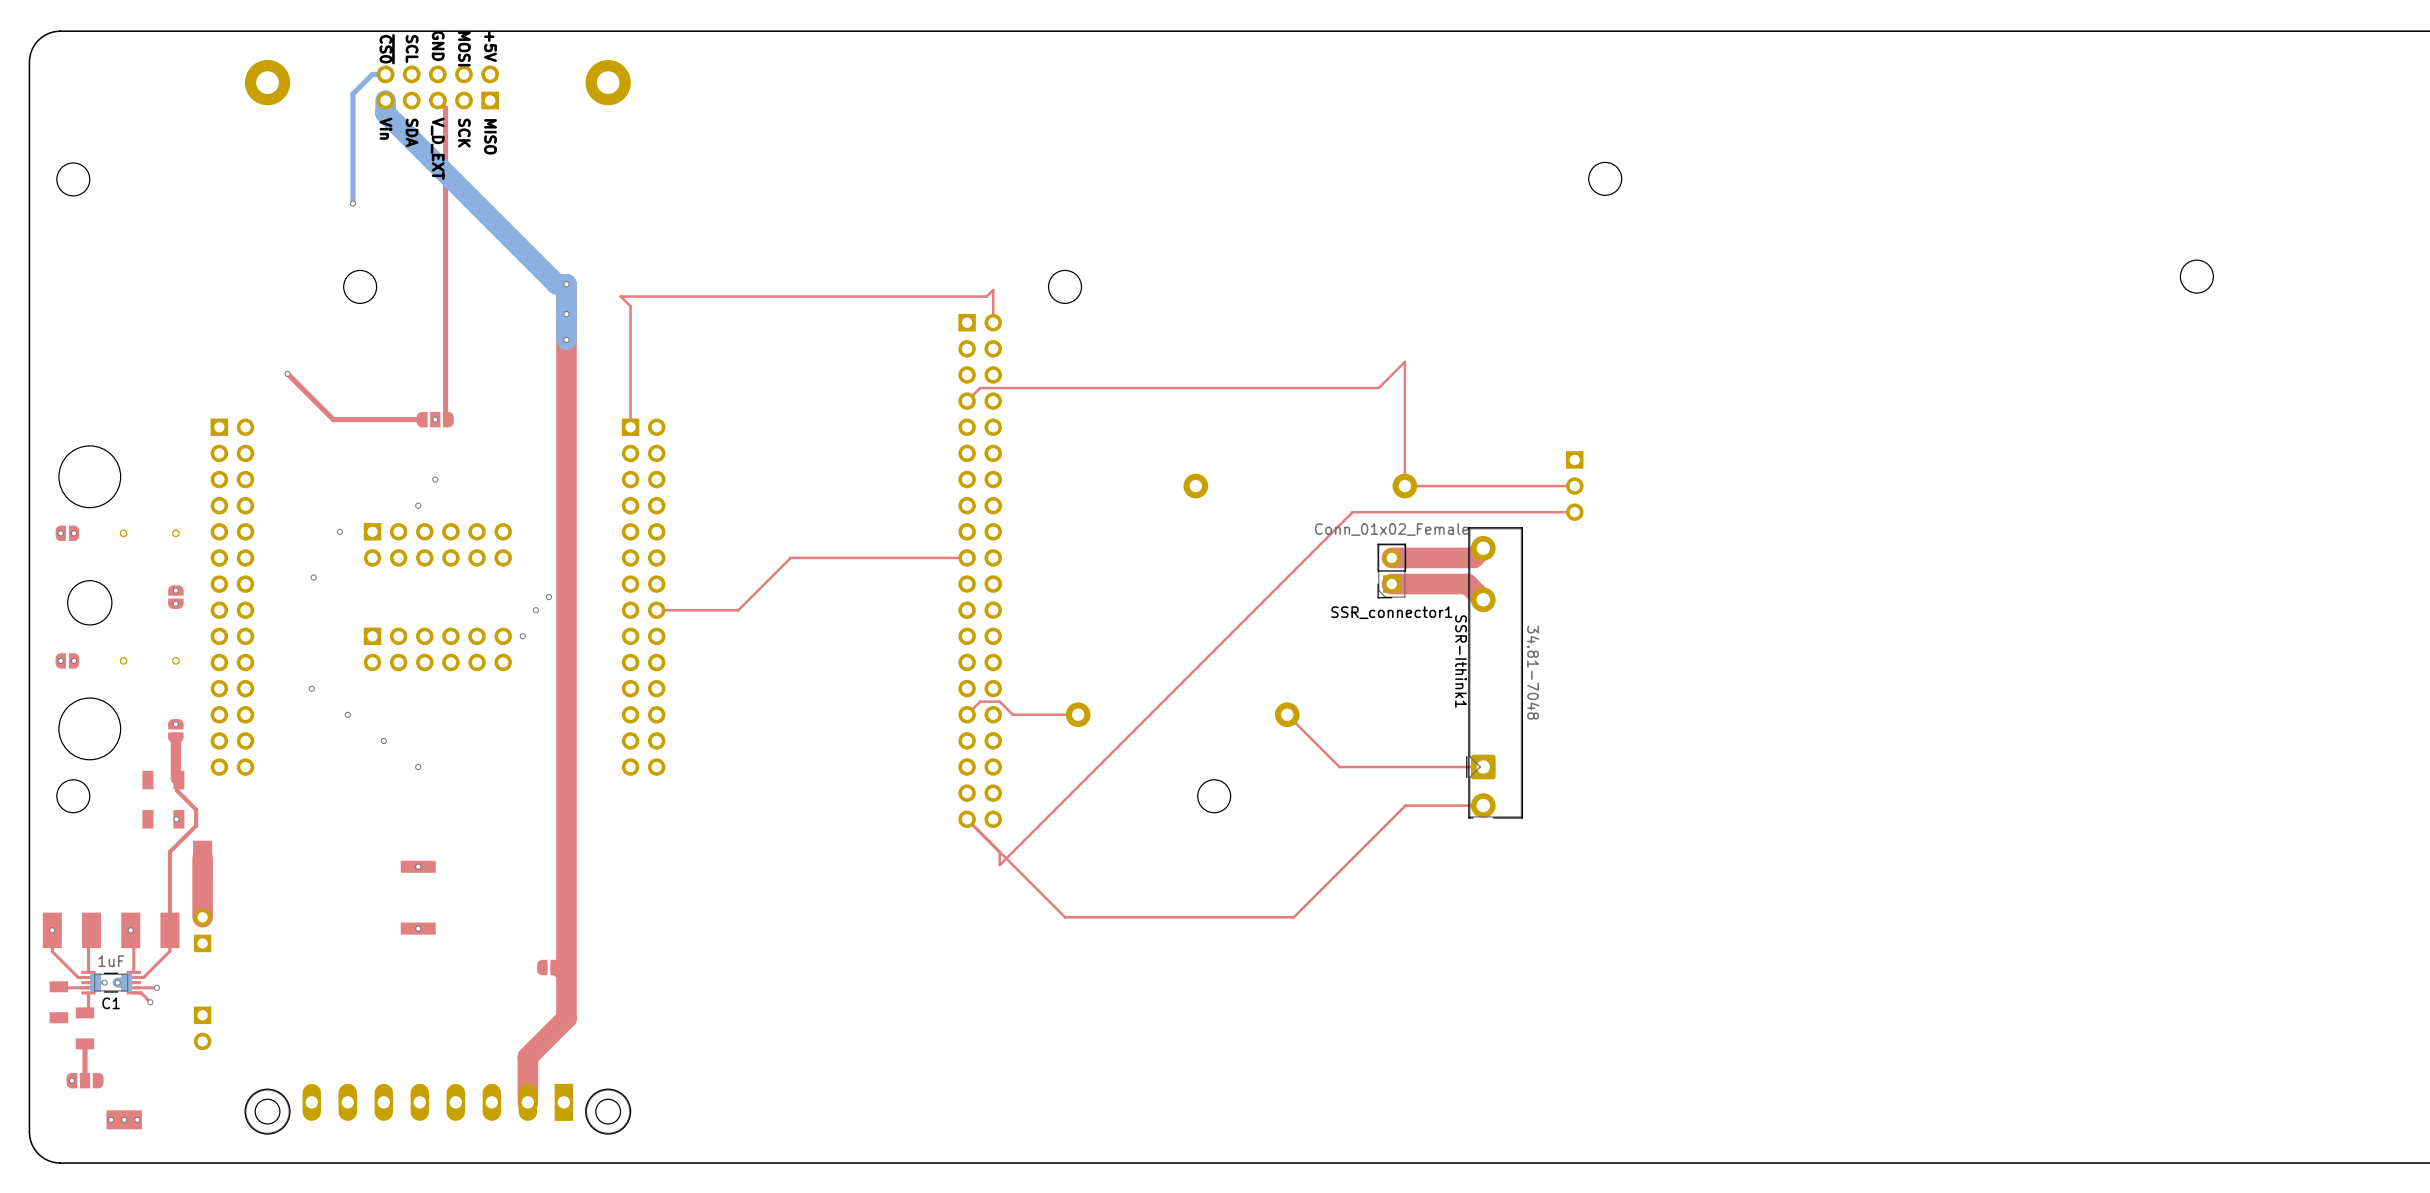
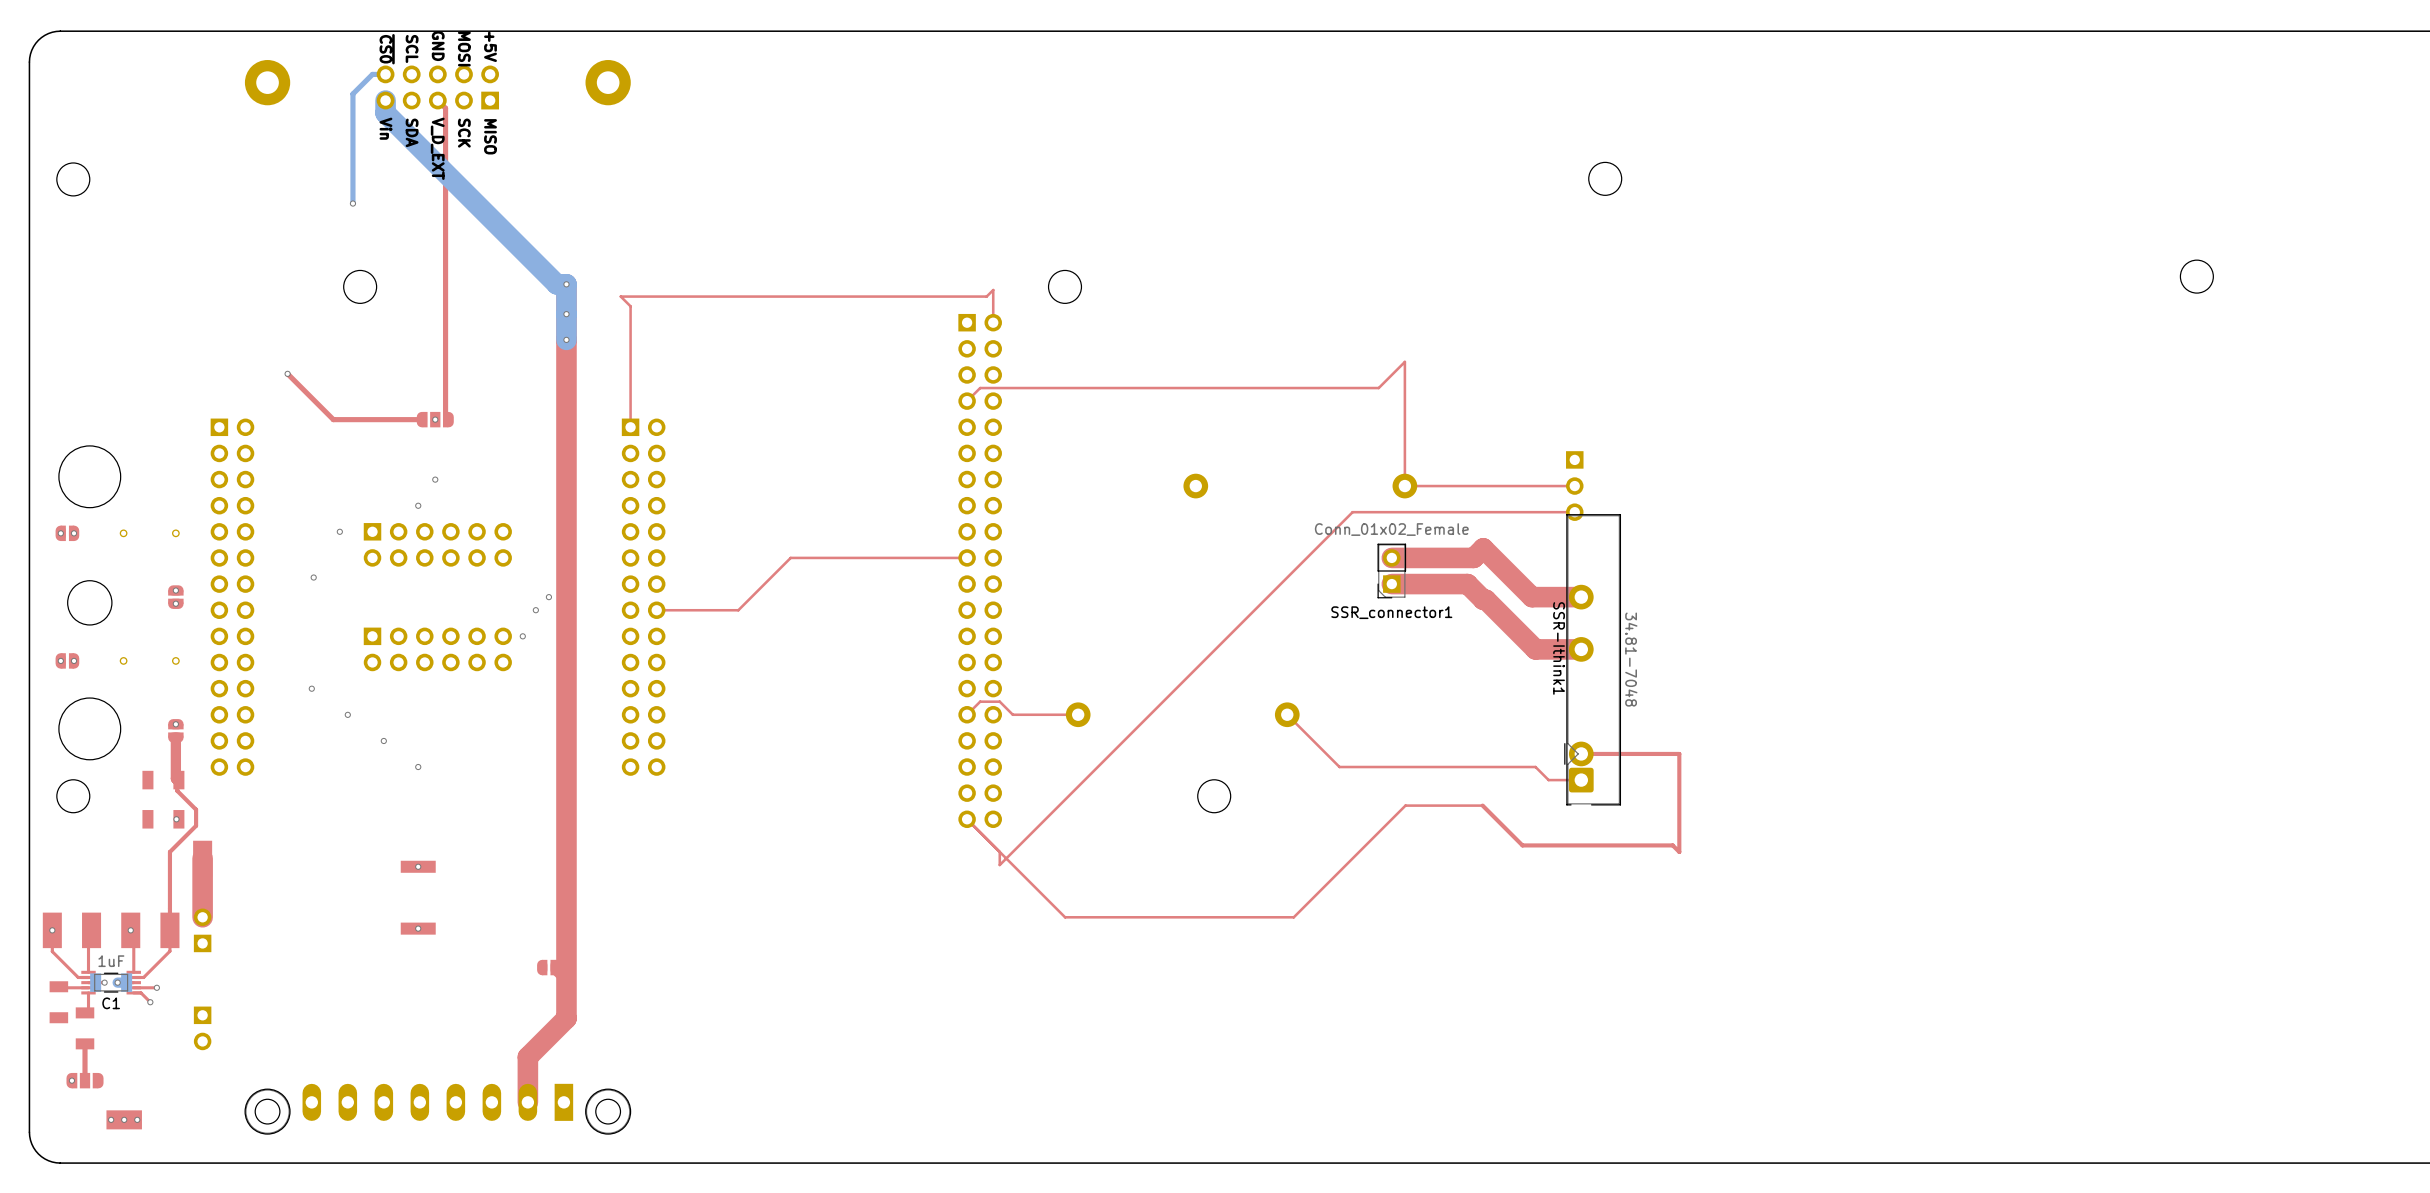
SSR-Ithink1 footprint: [1466, 527, 1524, 819] -> [1564, 514, 1622, 806]
top track: none -> (1483, 548) (1532, 597) (1581, 597)
top track: none -> (1483, 599) (1485, 599) (1535, 649) (1581, 649)
top track: none -> (1581, 753) (1679, 753) (1679, 851) (1672, 845) (1522, 845) (1482, 805)
top track: none -> (1483, 767) (1535, 767) (1548, 780) (1581, 780)

